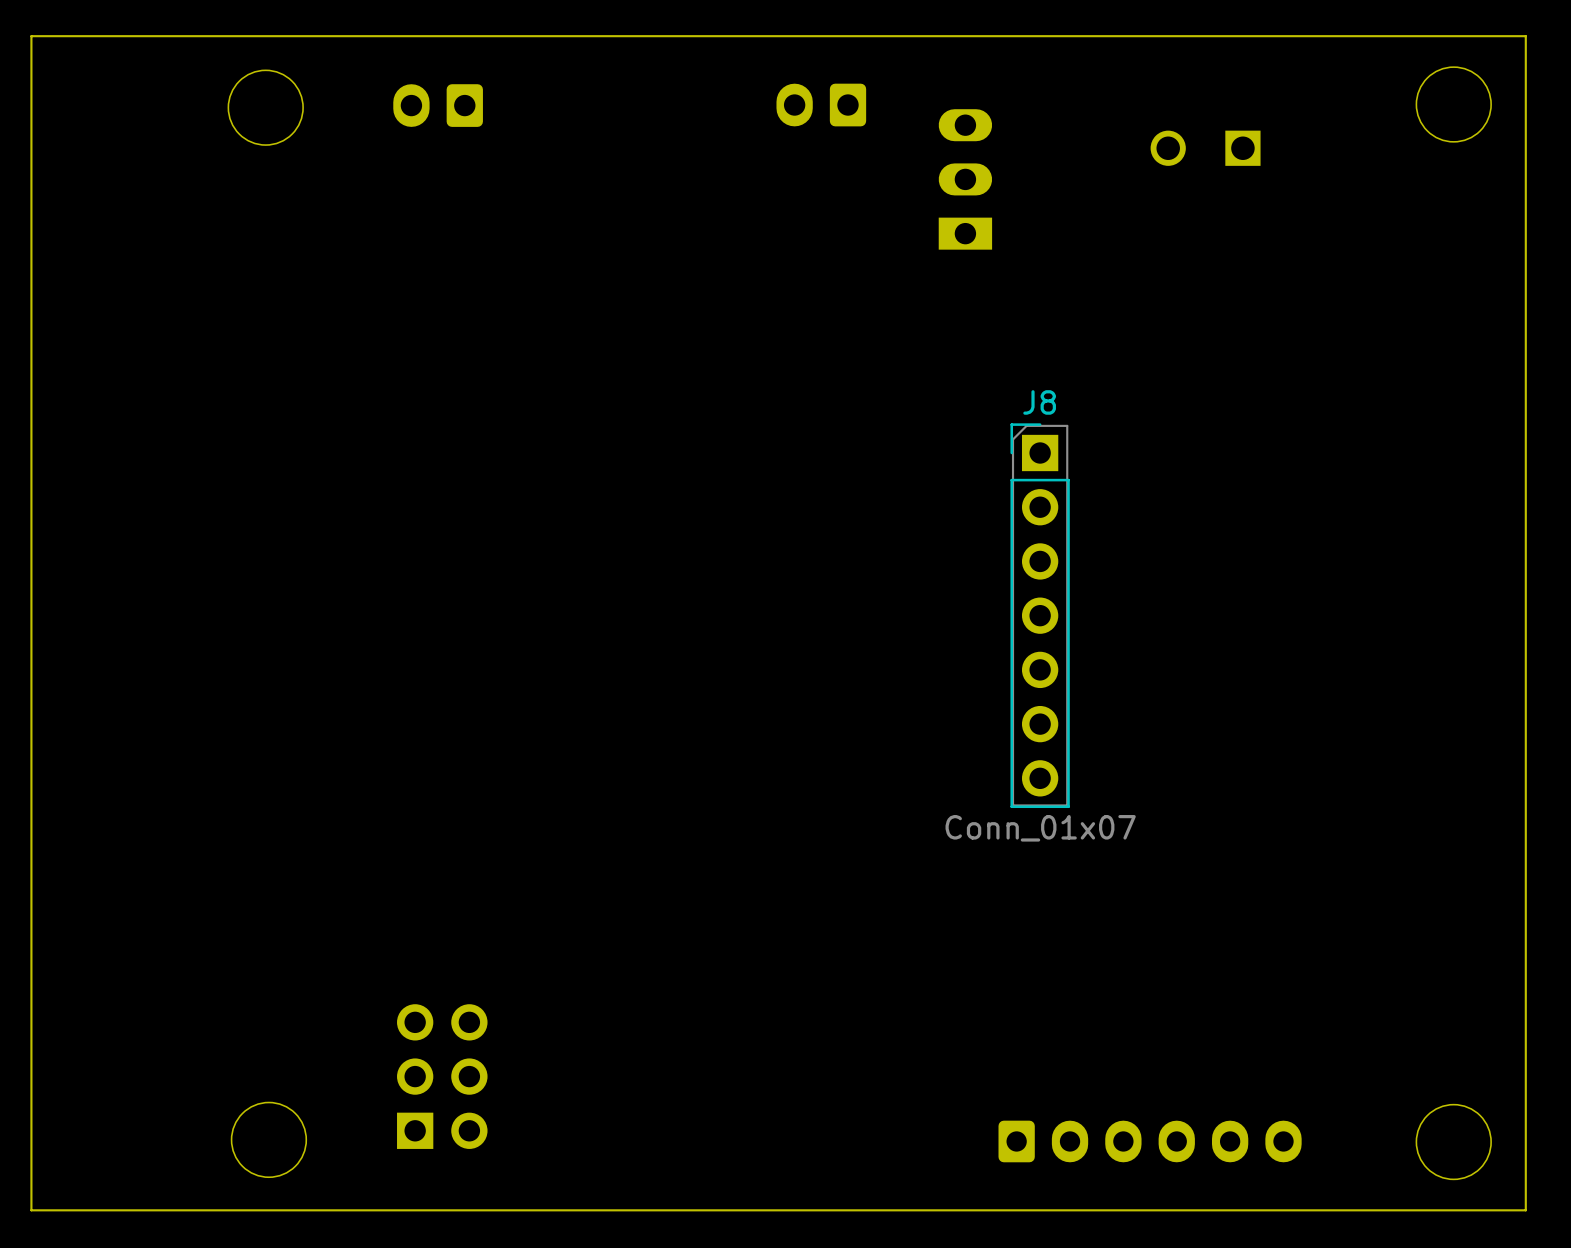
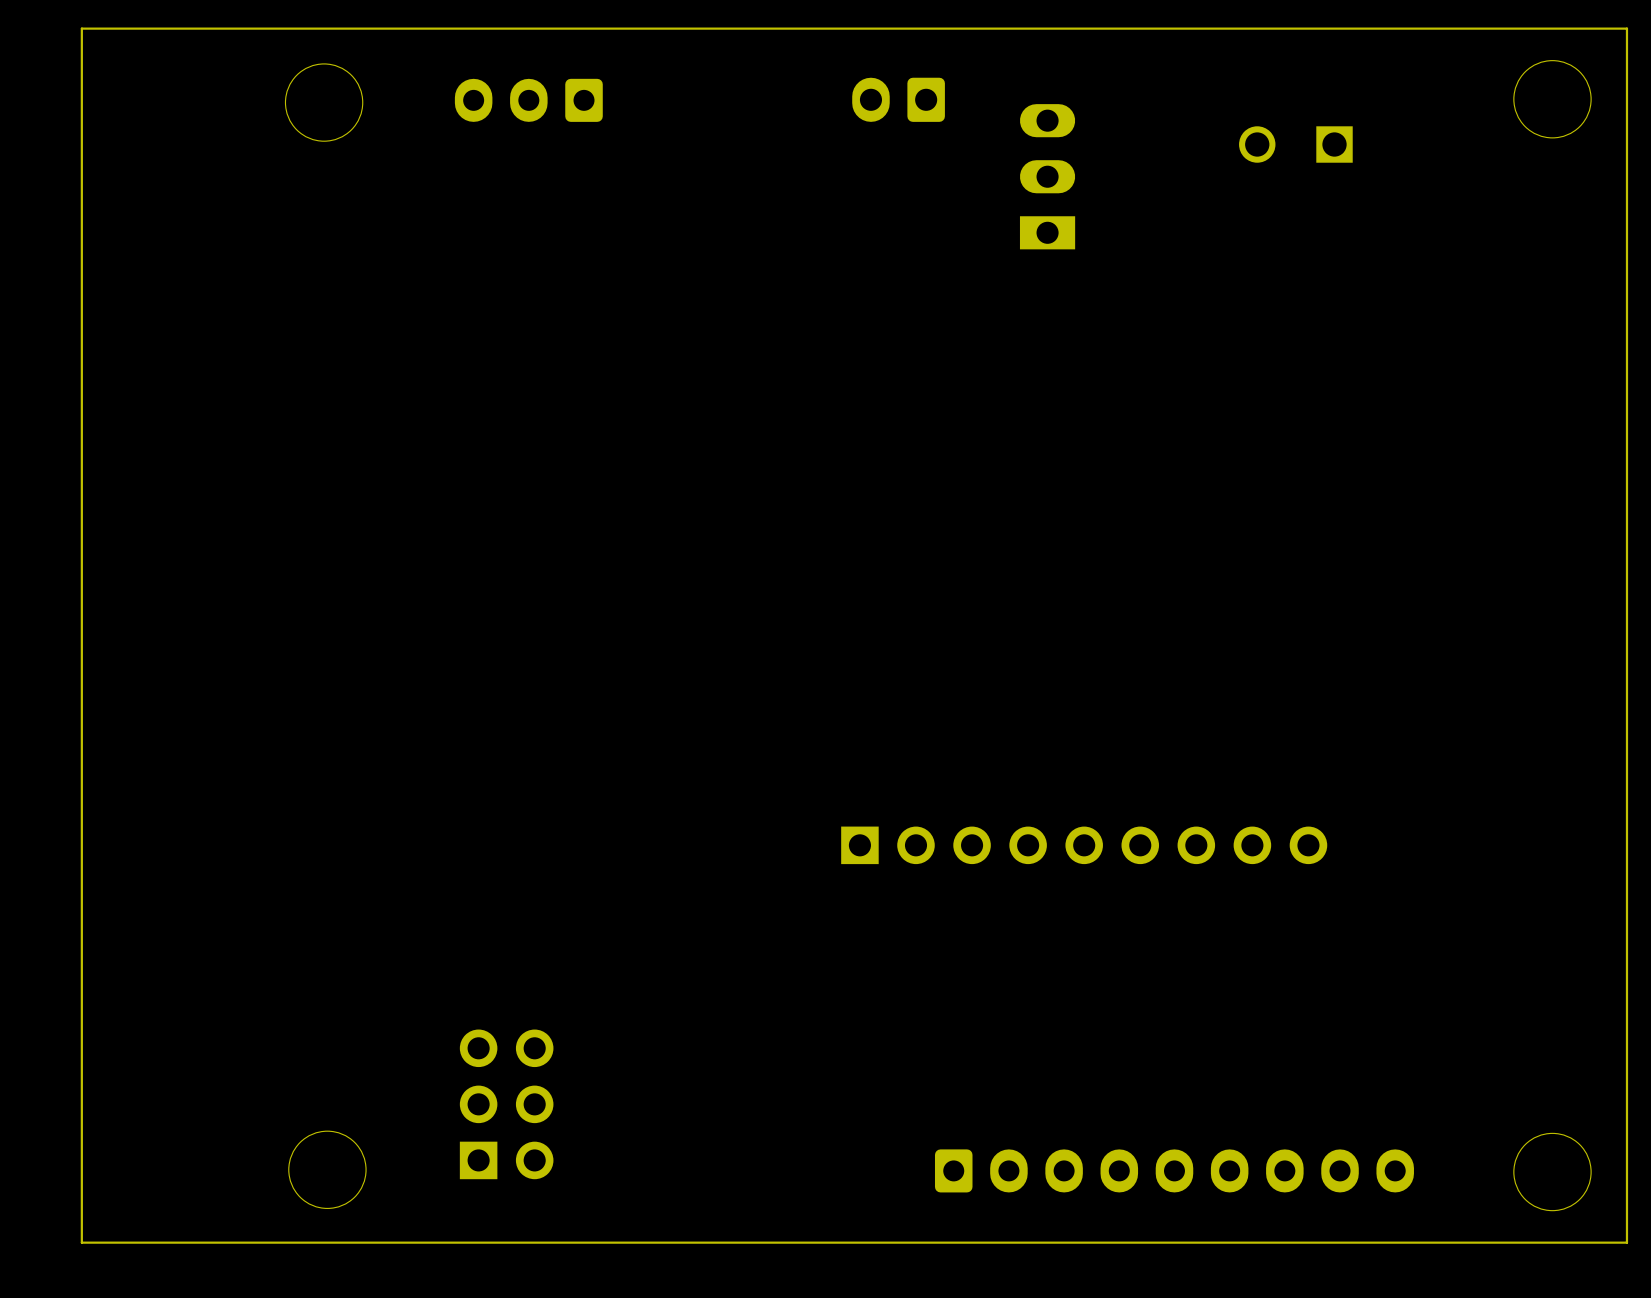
part: (438, 105) -> none
part: none -> (528, 100)
J8: Conn_01x07 (1040, 615) -> none
part: none -> (1084, 845)
part: none -> (1174, 1170)
part: (1150, 1141) -> none

